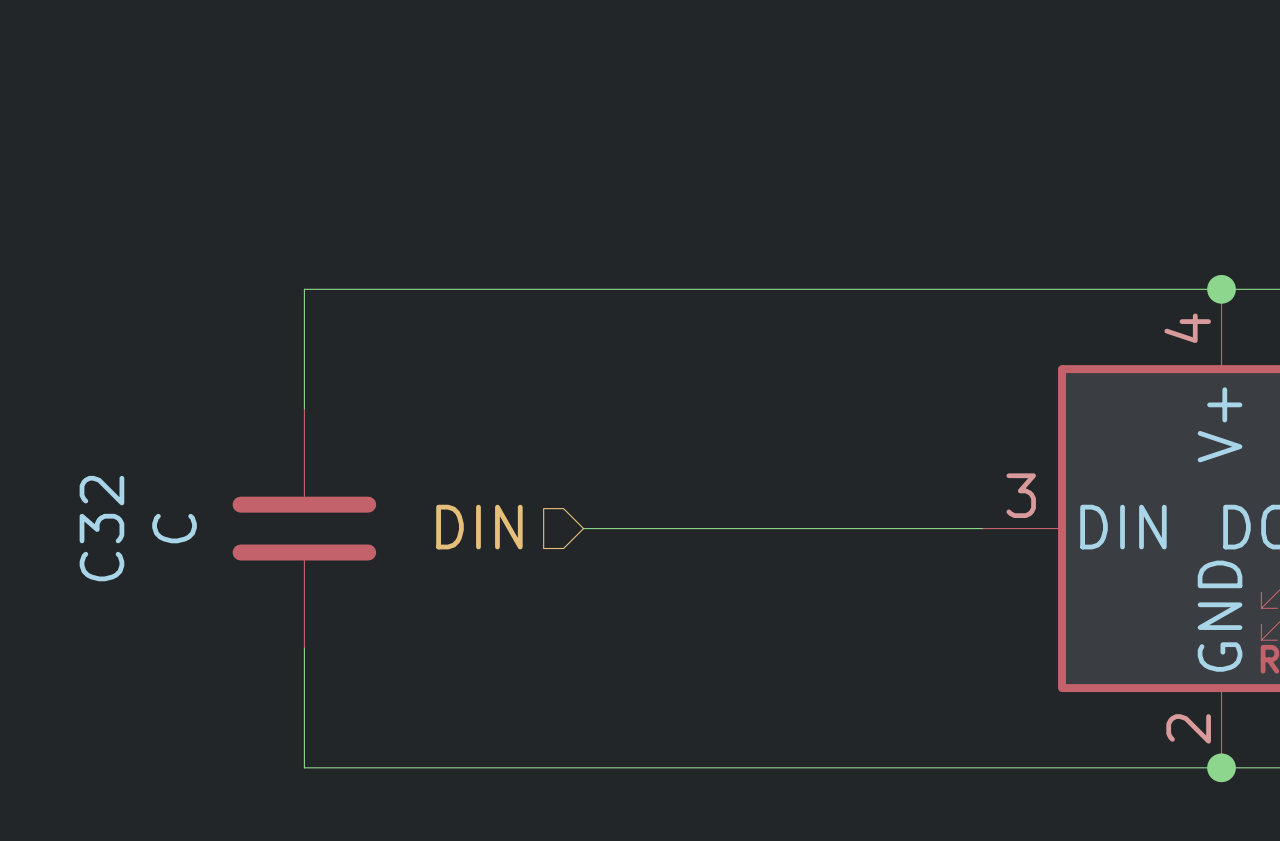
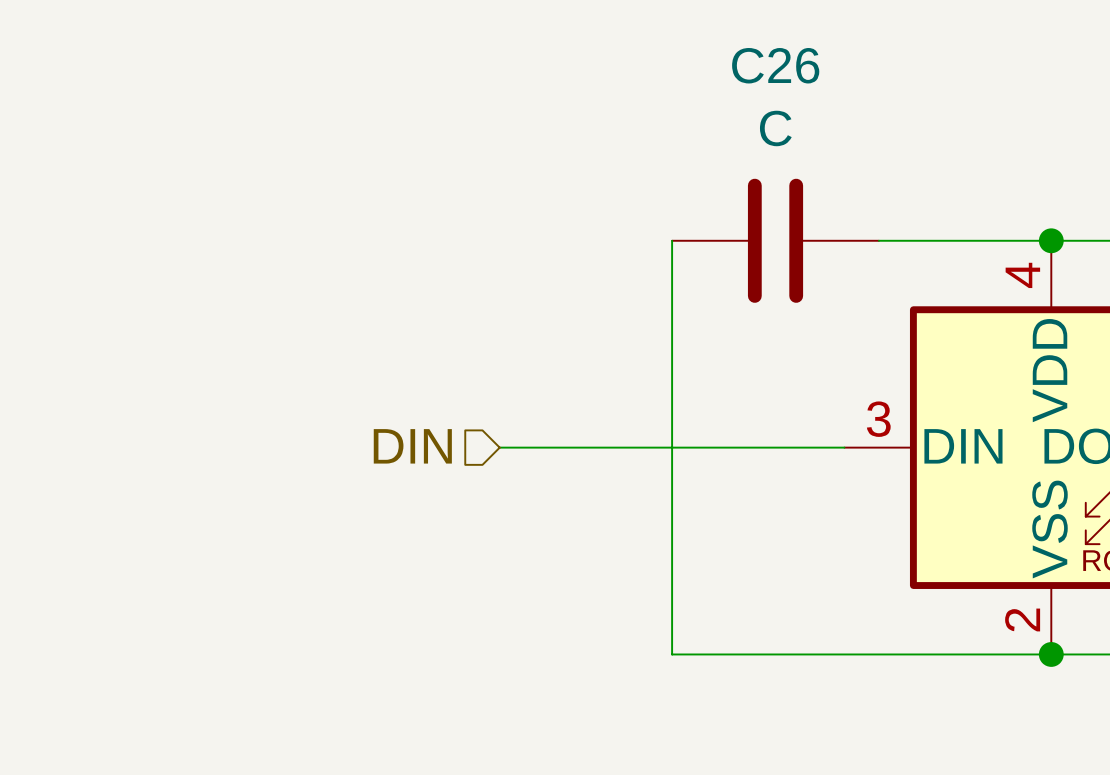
C26: none -> C (775, 240)
wire: (1022, 289) (304, 289) (304, 408) -> none
part pin name: V+ (1220, 424) -> VDD (1050, 370)
C32: C (304, 528) -> none
part pin name: GND (1220, 616) -> VSS (1050, 529)
wire: (304, 648) (304, 767) (782, 767) -> (672, 240) (672, 654)

